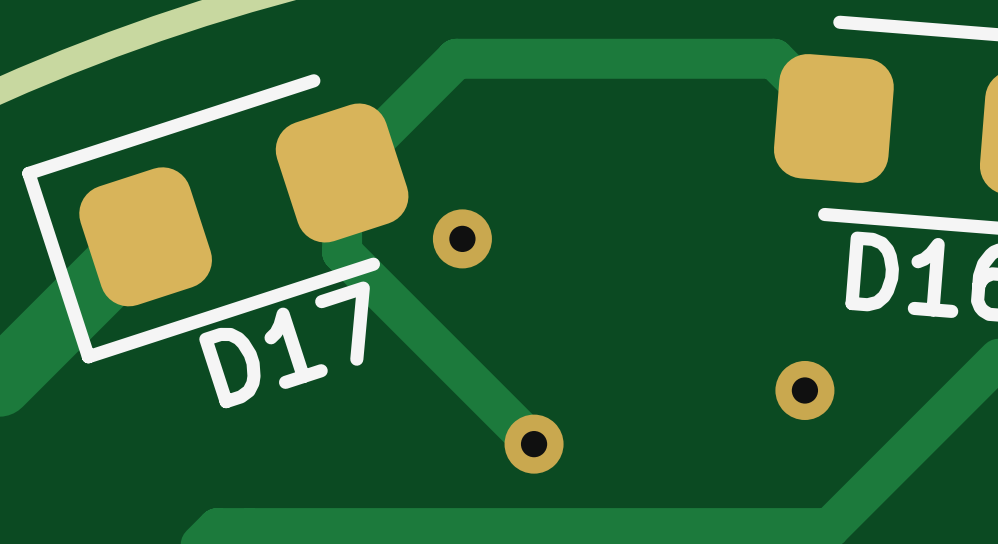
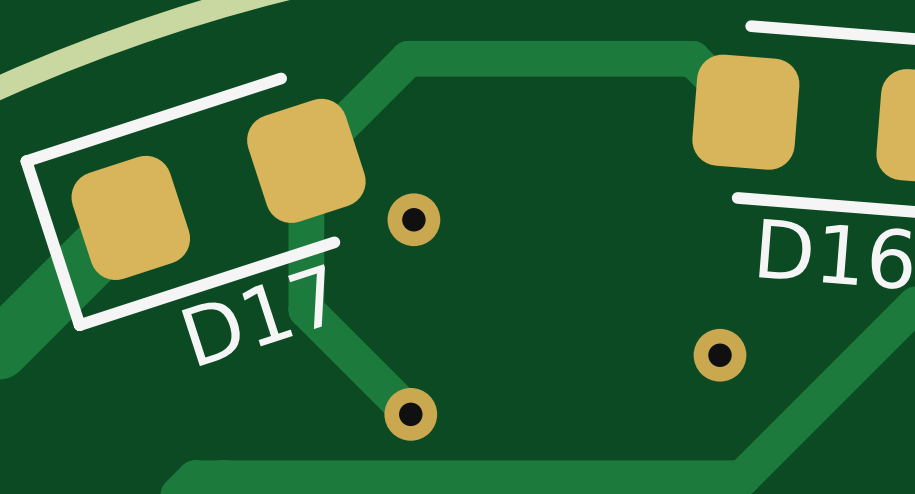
track: (342, 252) (534, 444) -> (306, 231) (306, 309) (410, 414)
via position: (534, 444) -> (410, 414)

